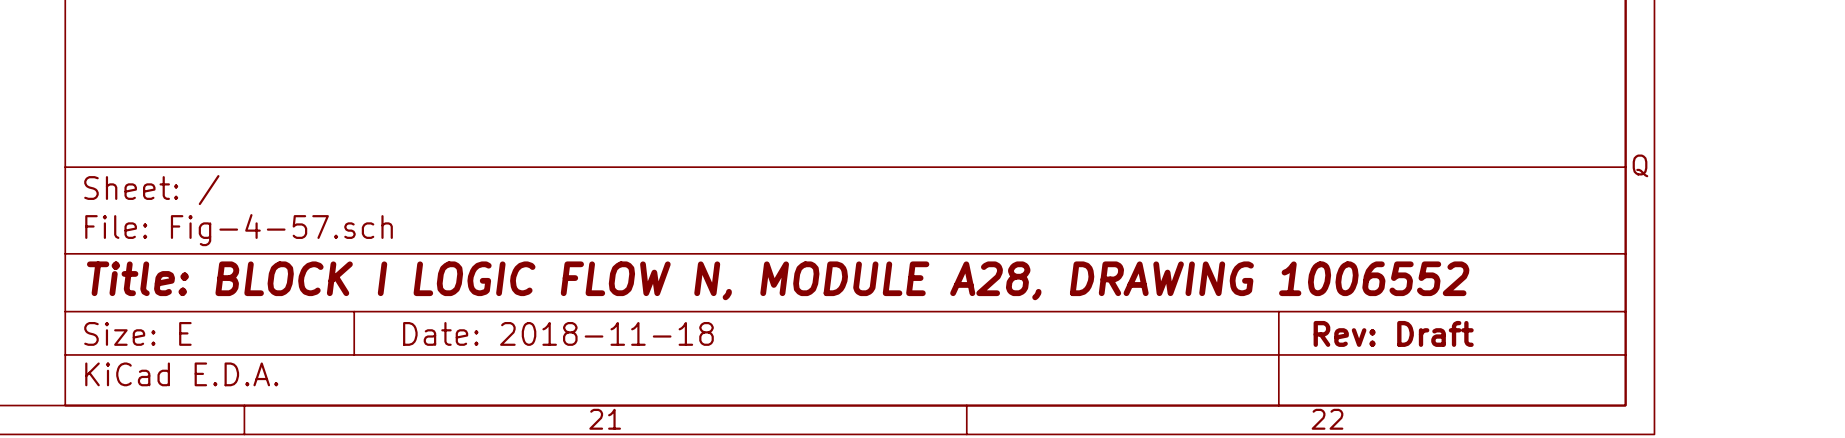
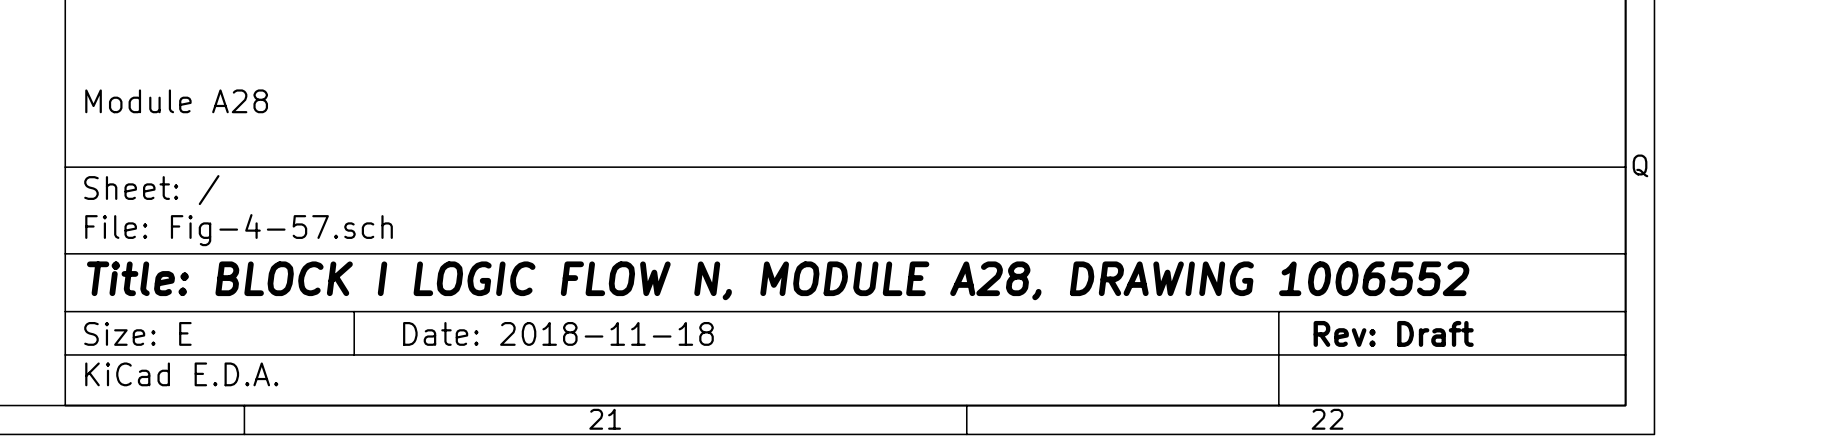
title block: none -> Module A28 (176, 101)

